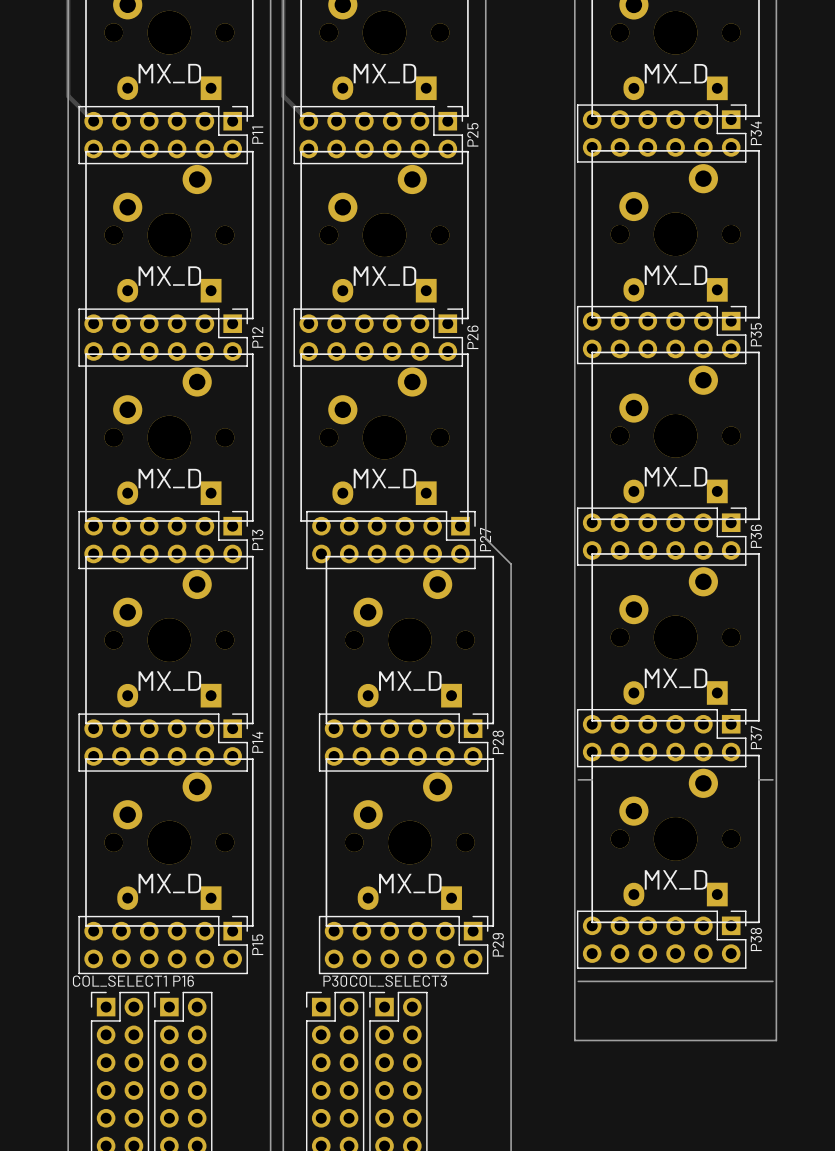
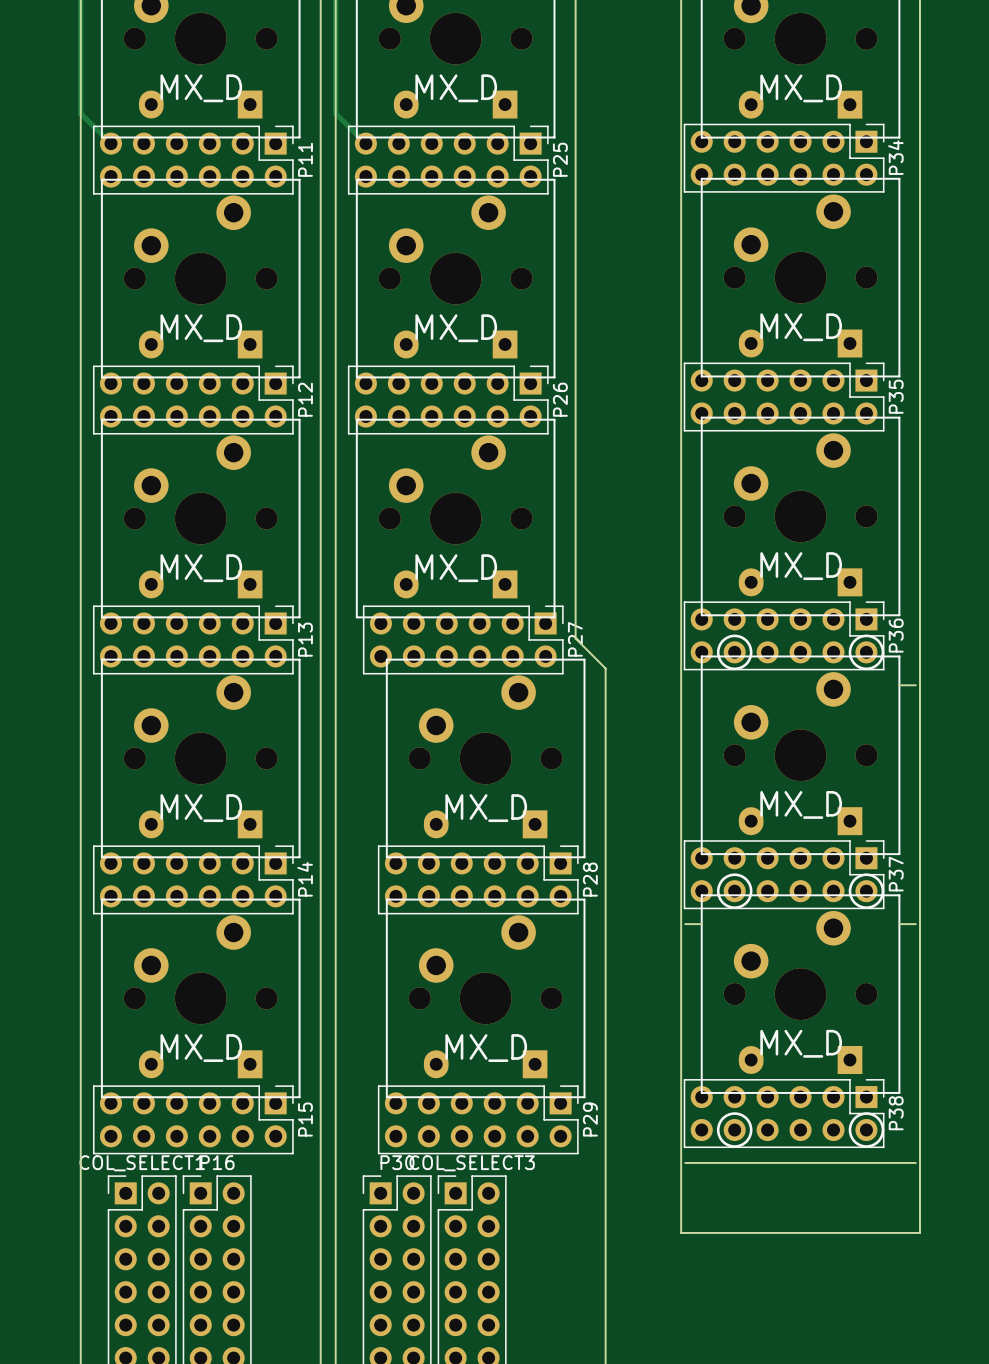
drawing: none -> [716, 634, 753, 671]
drawing: none -> [848, 634, 885, 671]
board edge: none -> (899, 685) (915, 685)
drawing: none -> [716, 873, 753, 909]
drawing: none -> [848, 873, 885, 909]
drawing: none -> [716, 1112, 753, 1148]
drawing: none -> [848, 1112, 885, 1148]

